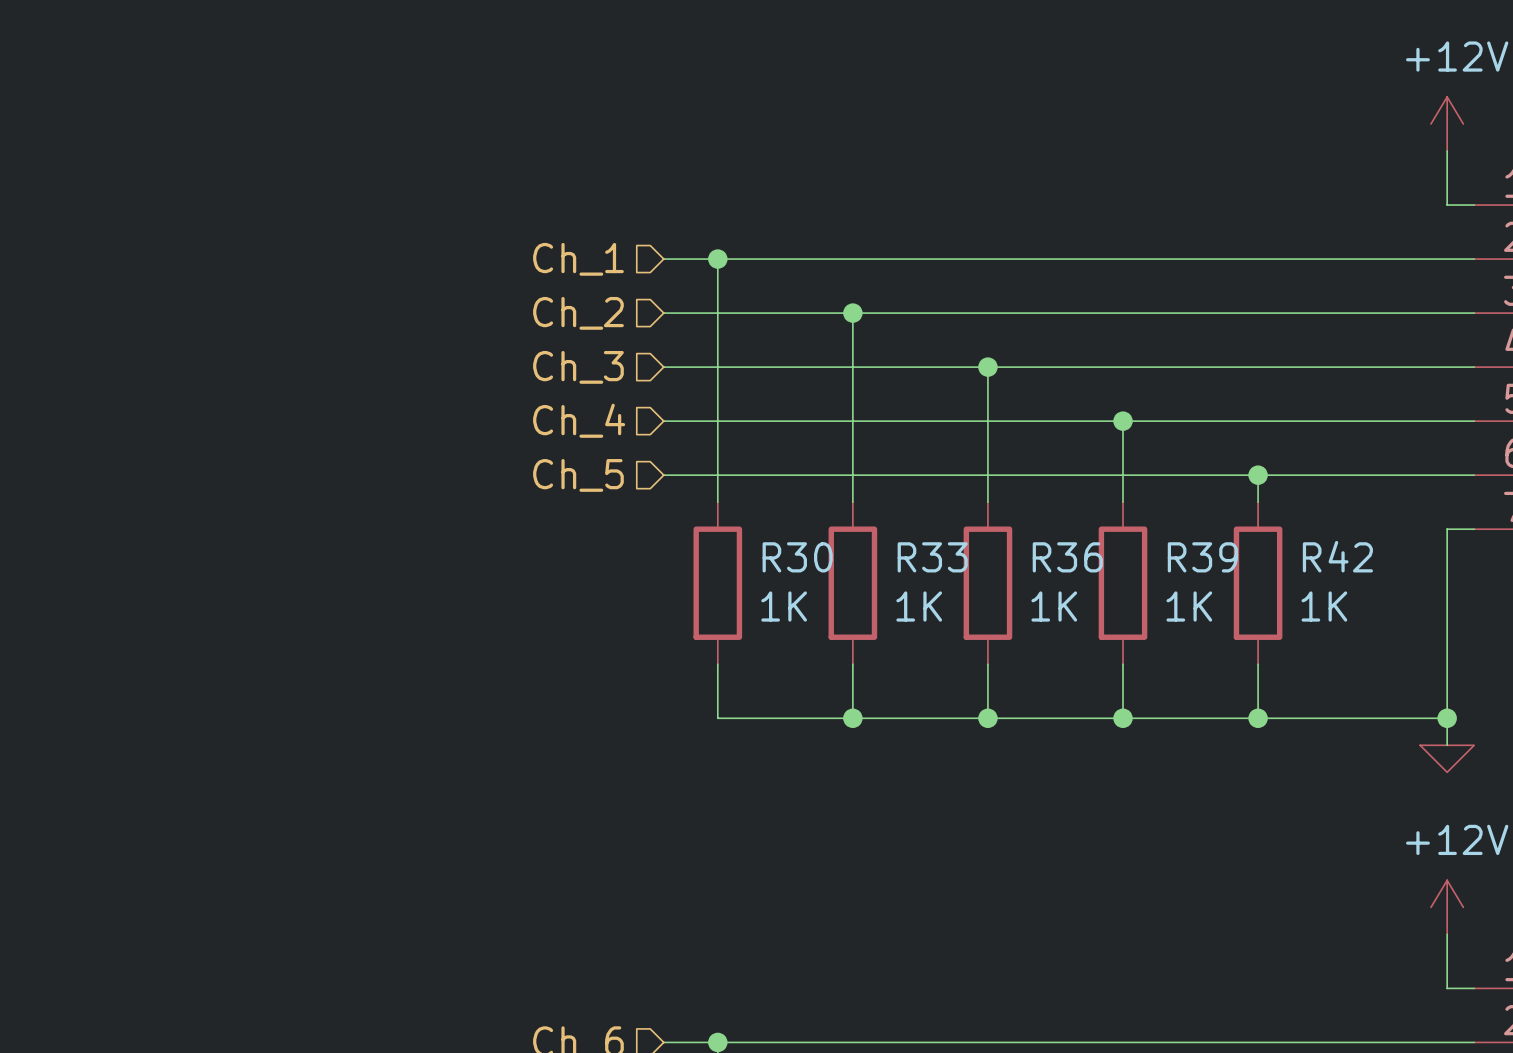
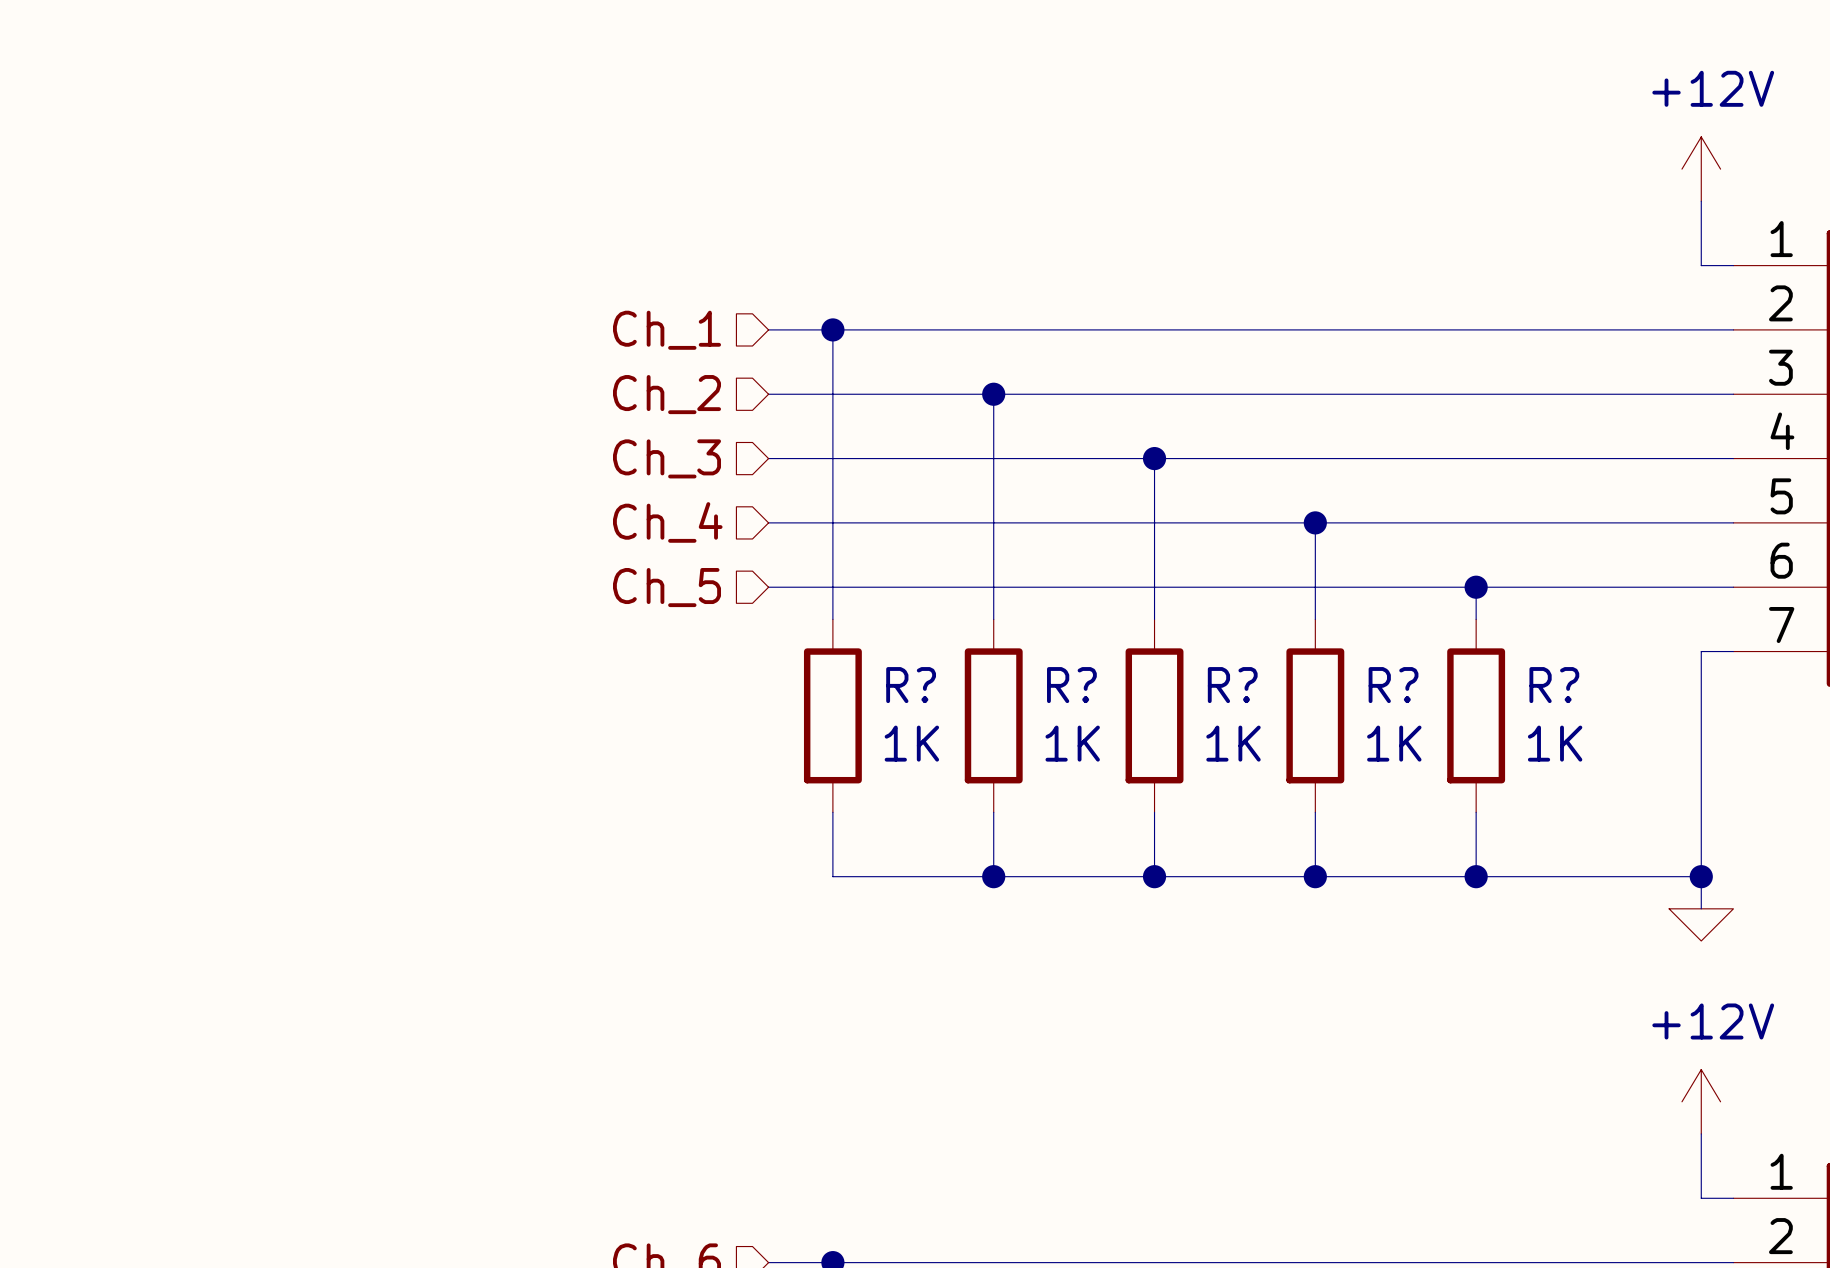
R42 name: R42 (1337, 556) -> R? (1554, 685)
R30 name: R30 (797, 557) -> R? (911, 685)
R33 name: R33 (932, 557) -> R? (1071, 685)
R36 name: R36 (1067, 557) -> R? (1232, 685)
R39 name: R39 (1202, 557) -> R? (1393, 685)

